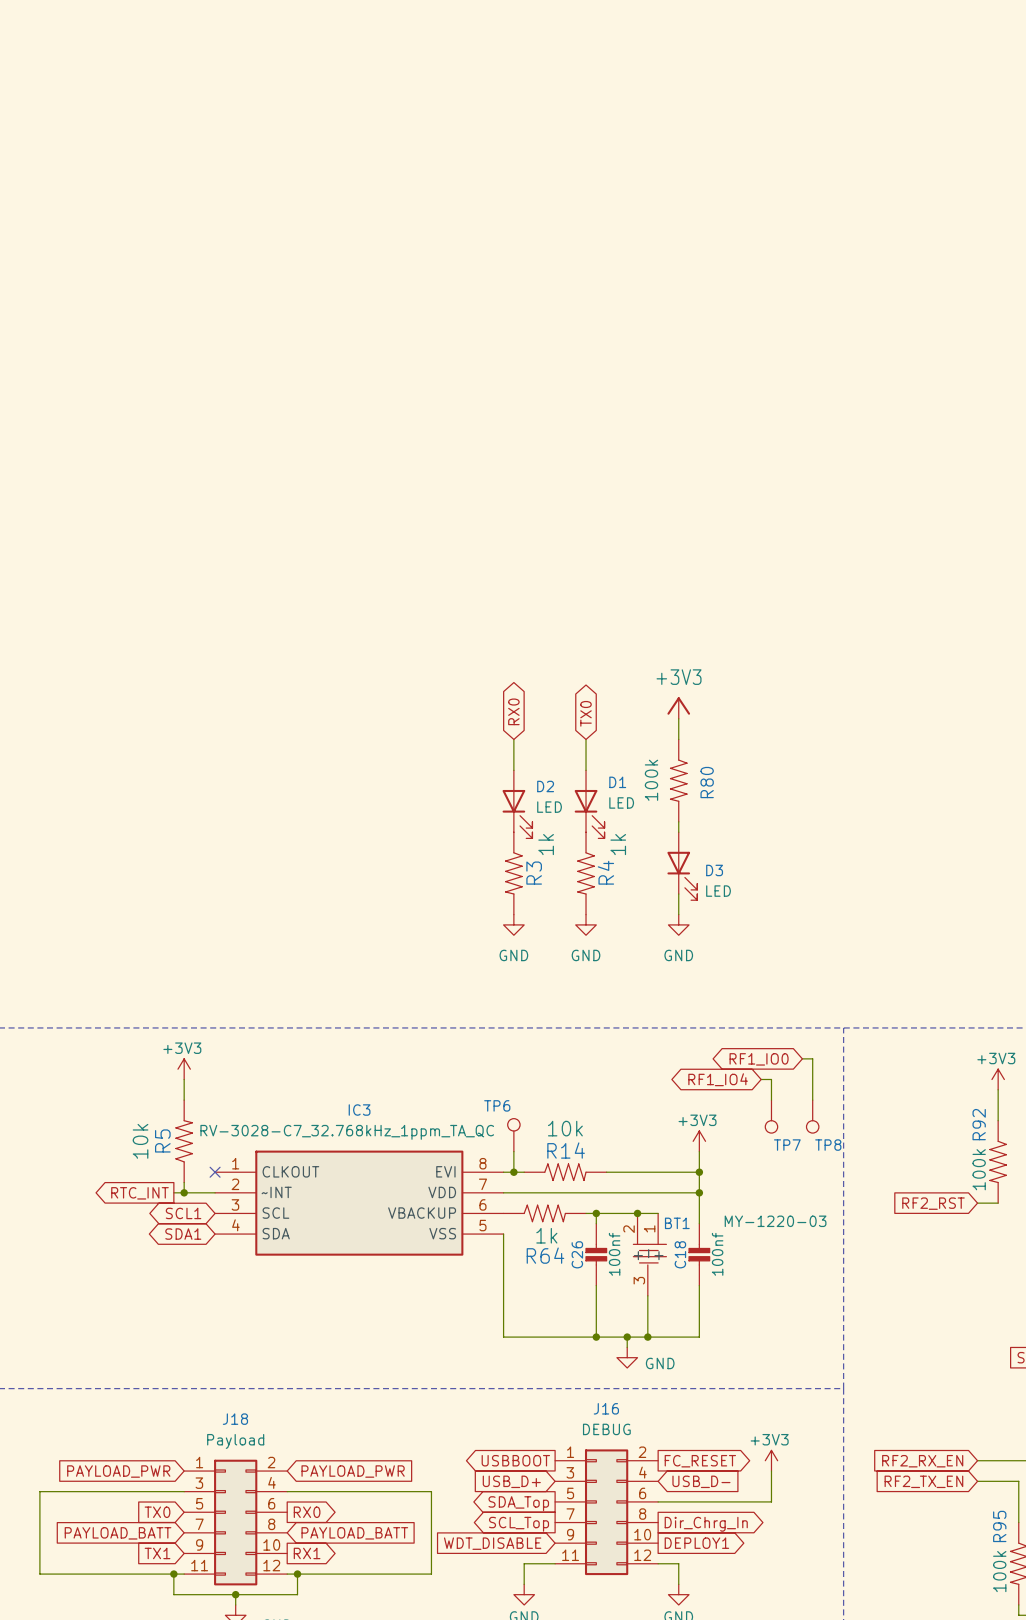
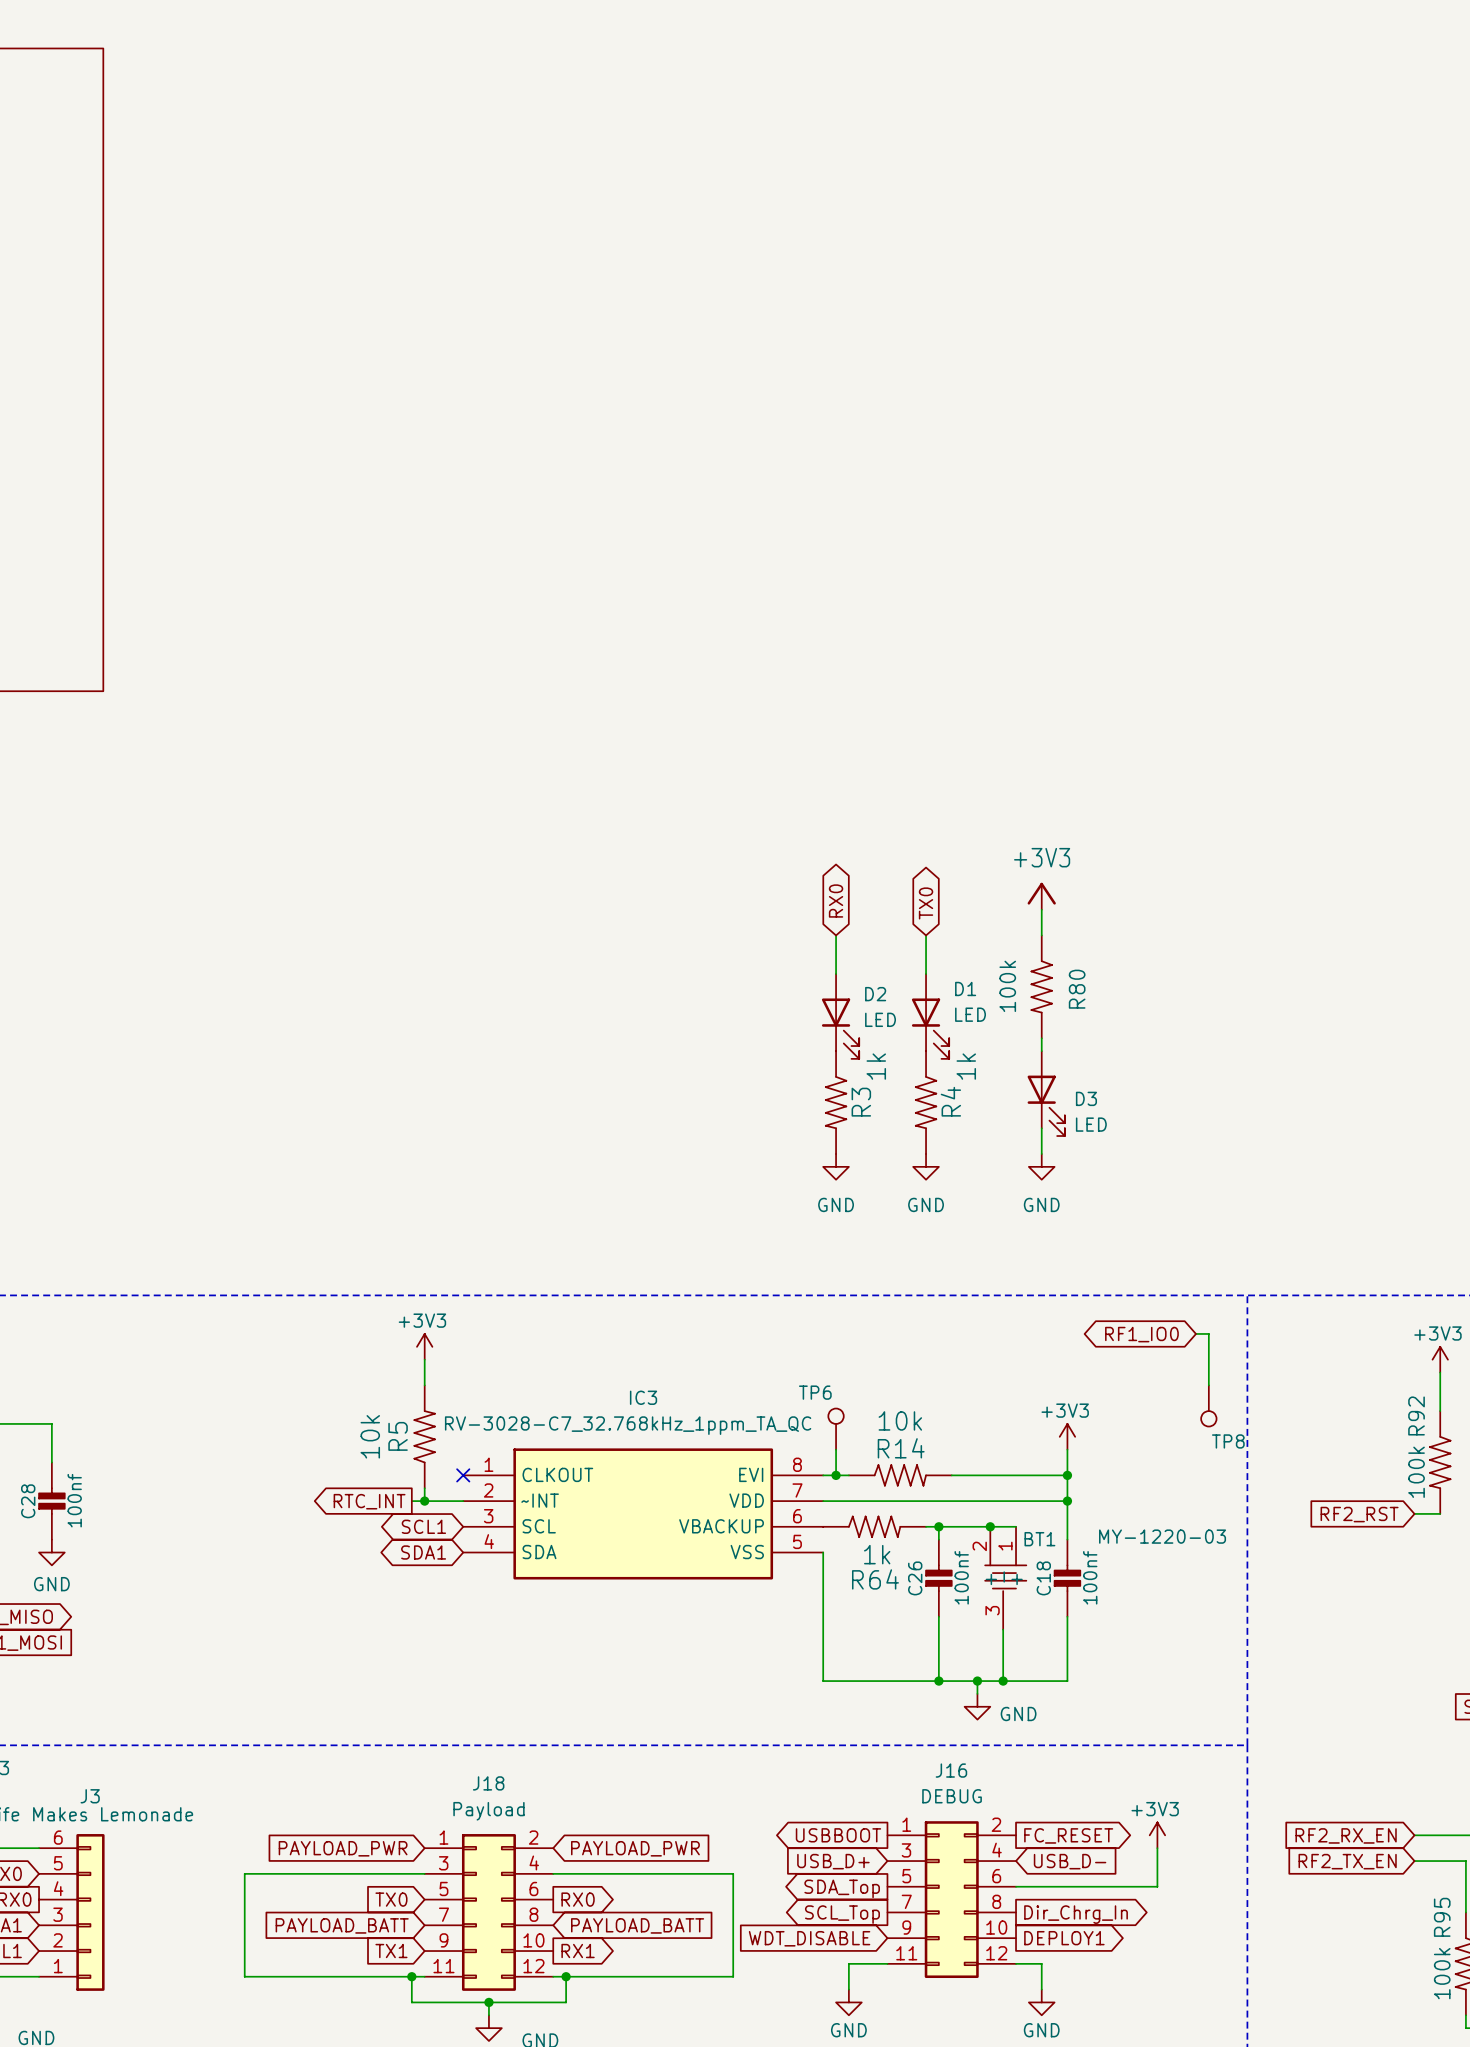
global label: RF1_IO4 (718, 1079) -> none
wire: (761, 1079) (771, 1079) (771, 1100) -> none
TP7: (771, 1116) -> none

